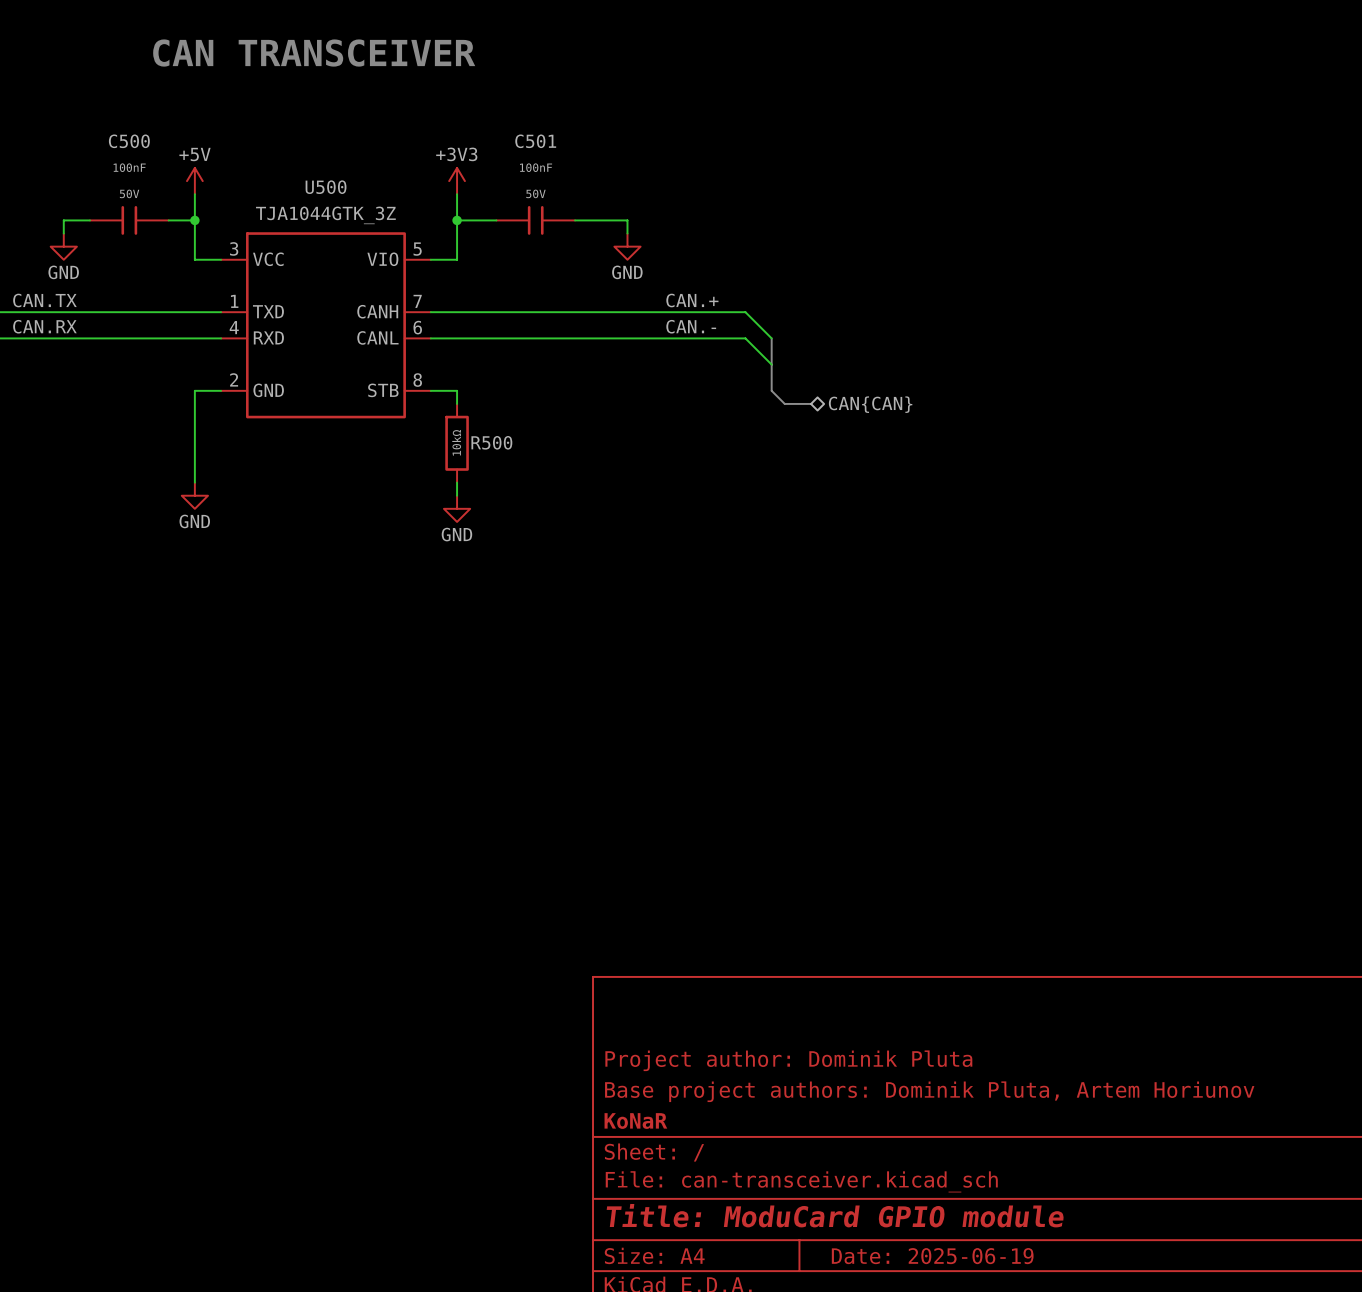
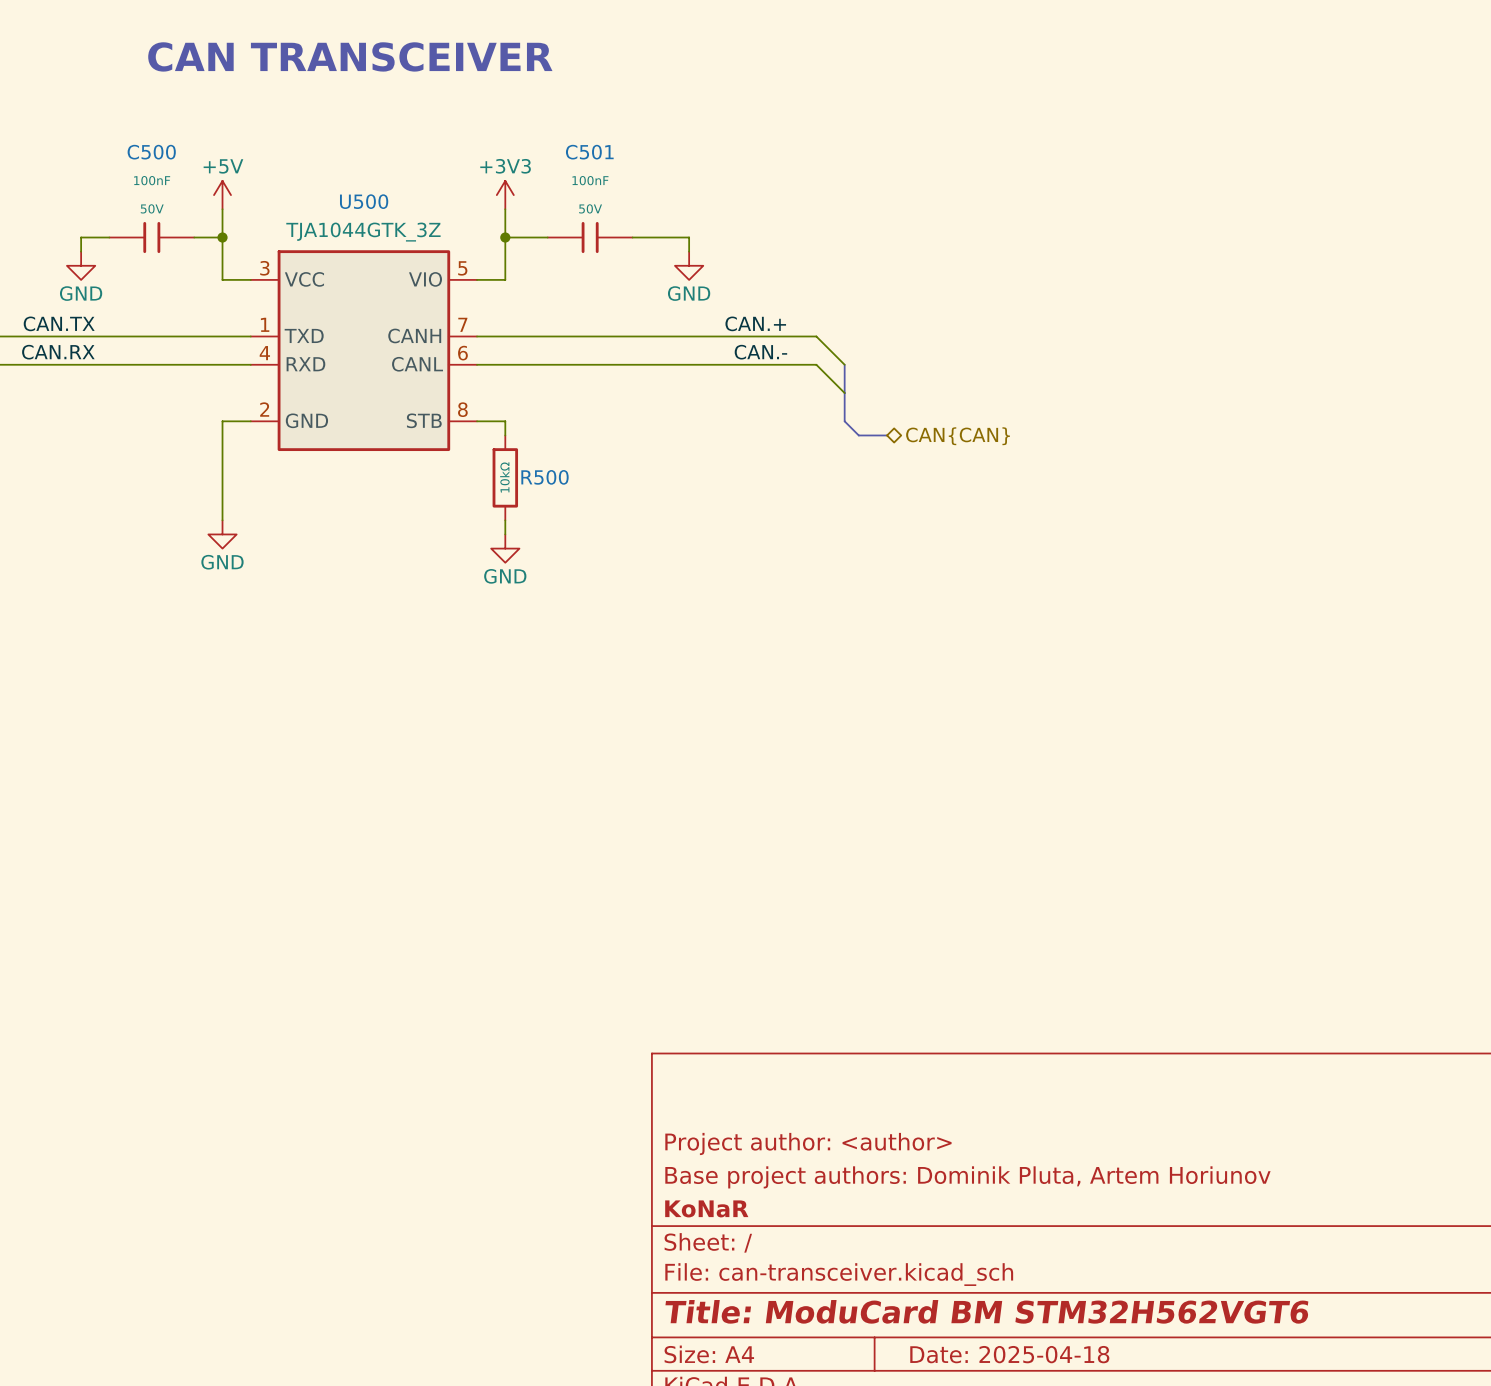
title block: Project author: Dominik Pluta (788, 1060) -> Project author: <author> (808, 1143)
title block: Title: ModuCard GPIO module (835, 1215) -> Title: ModuCard BM STM32H562VGT6 (986, 1311)
title block: Date: 2025-06-19 (932, 1256) -> Date: 2025-04-18 (1009, 1354)

